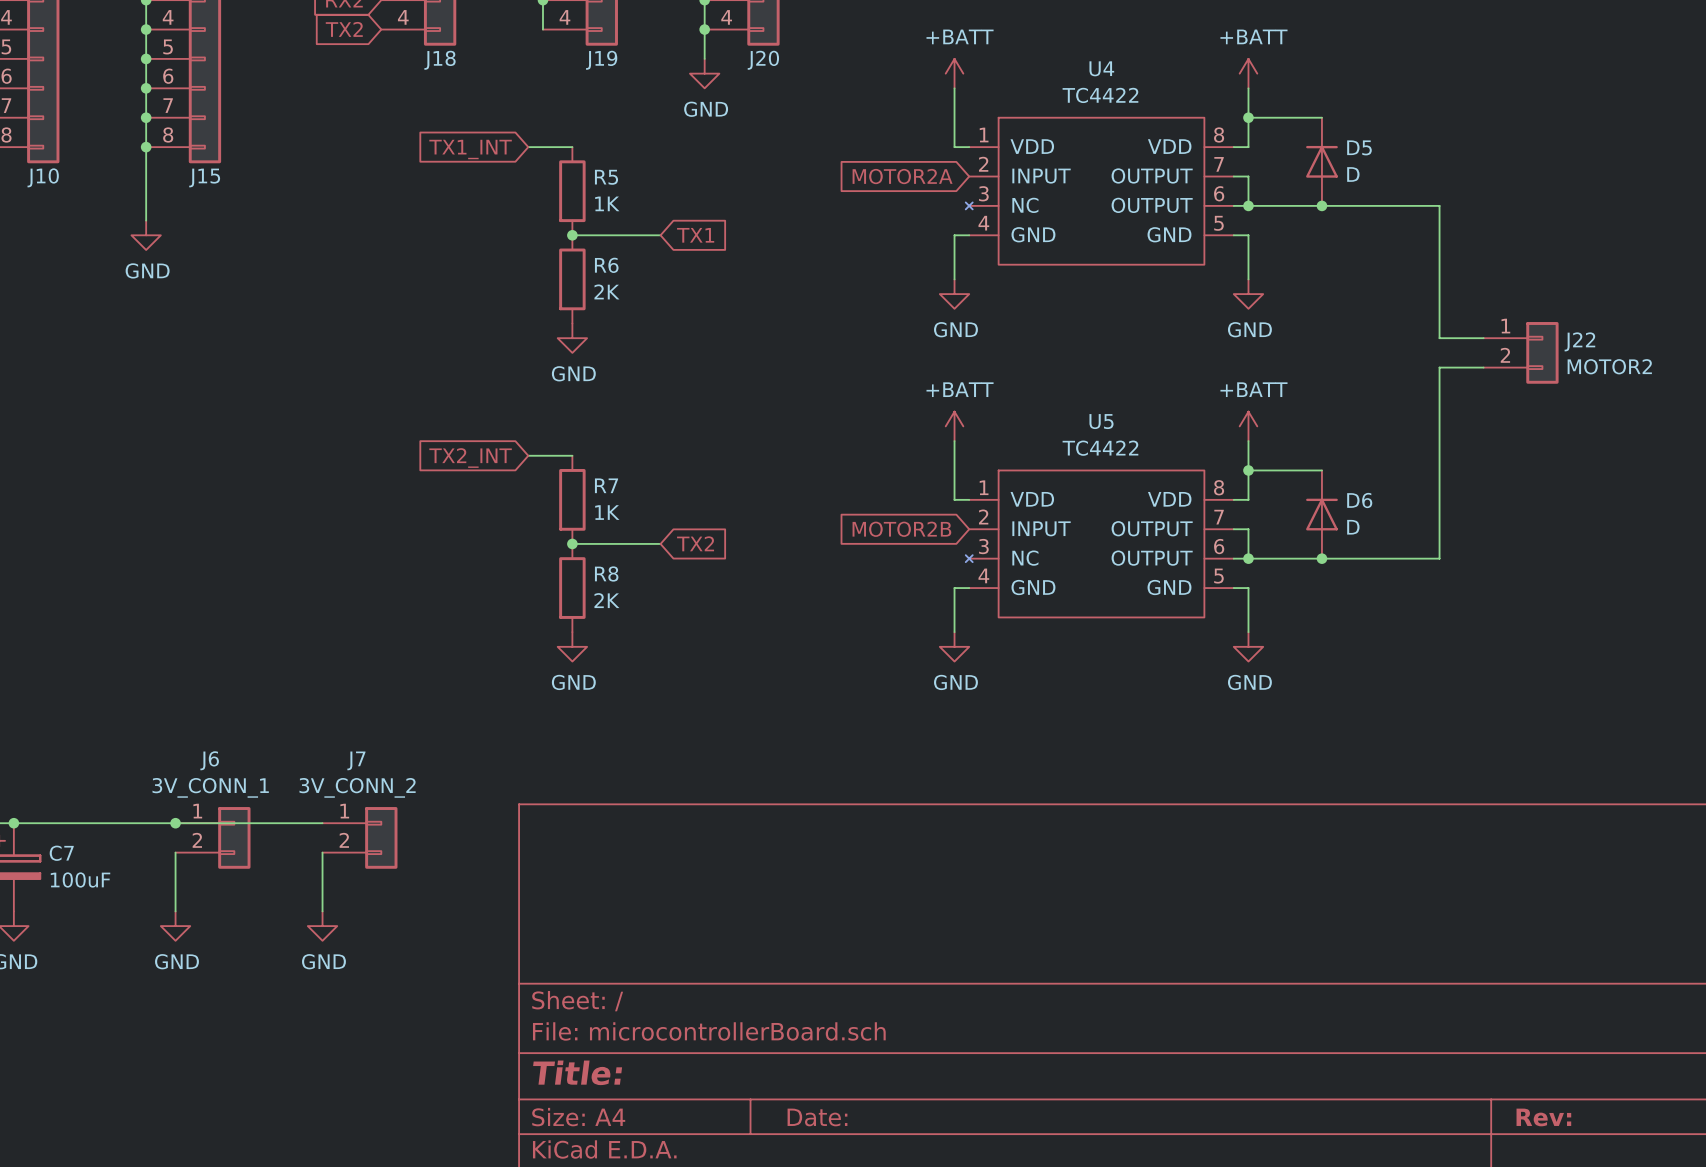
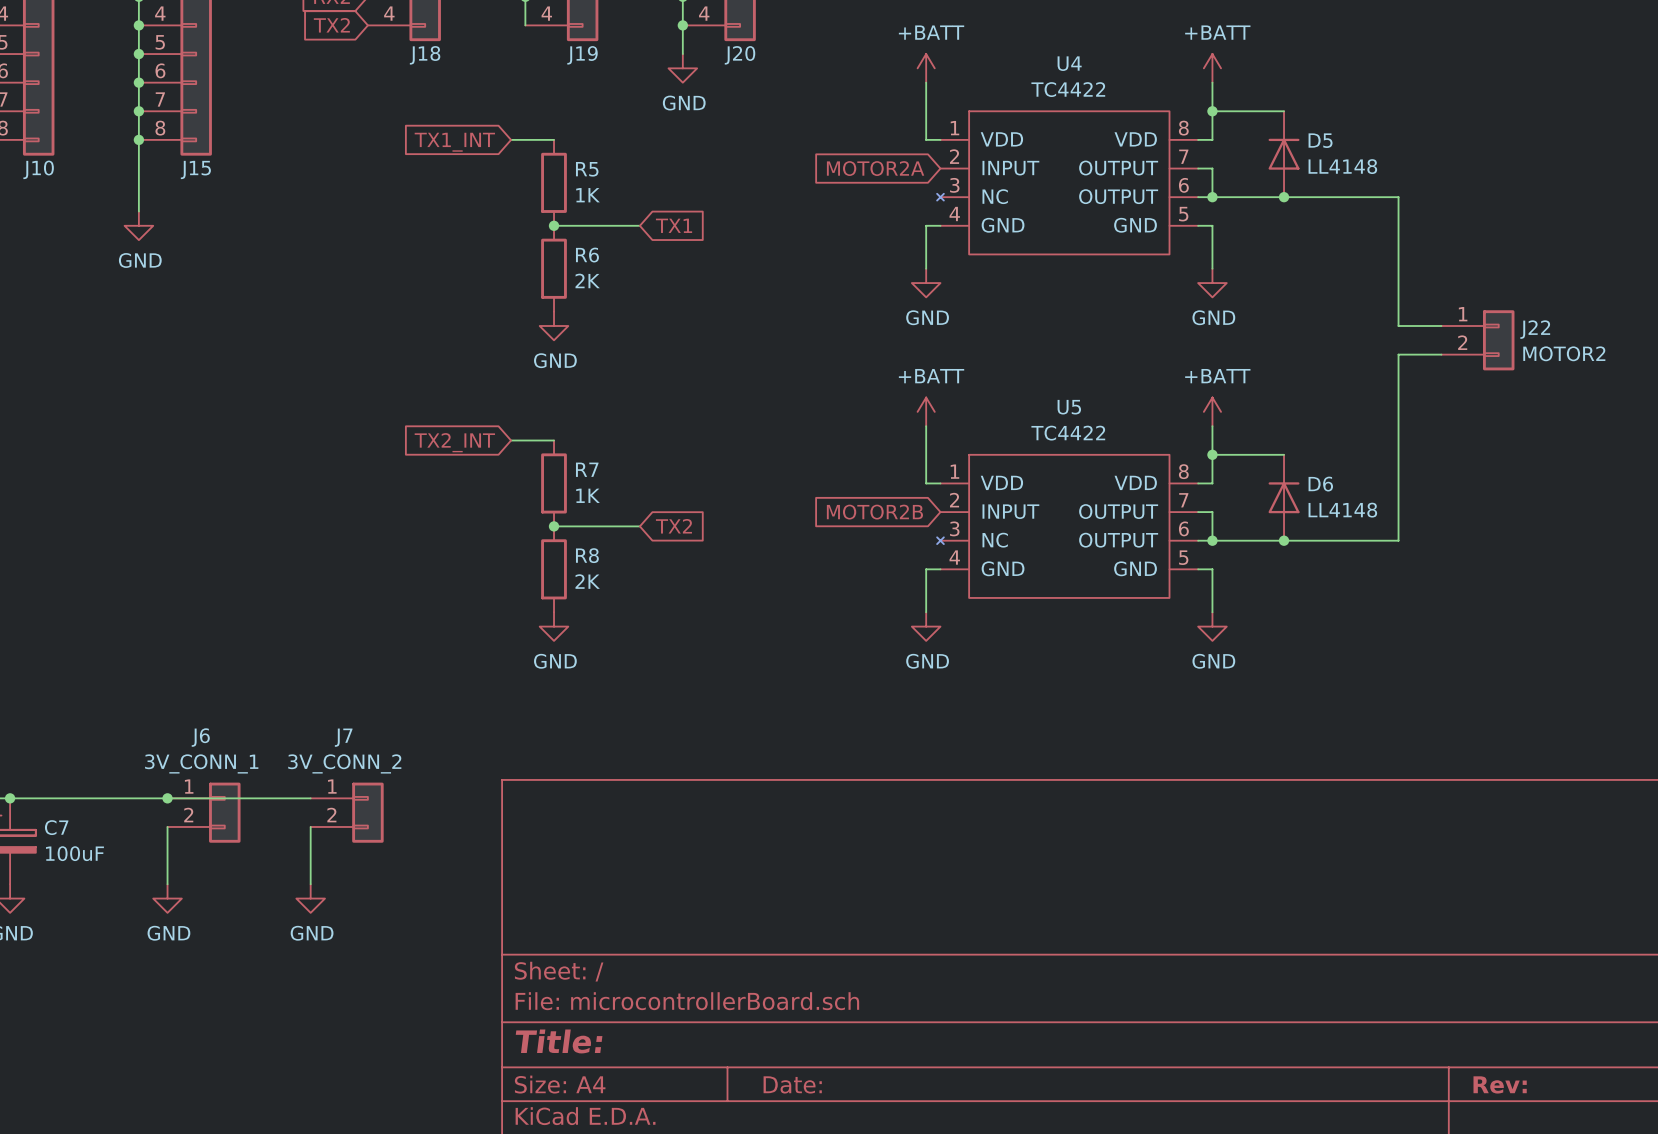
D5 value: D (1353, 174) -> LL4148 (1342, 166)
D6 value: D (1353, 527) -> LL4148 (1342, 510)

